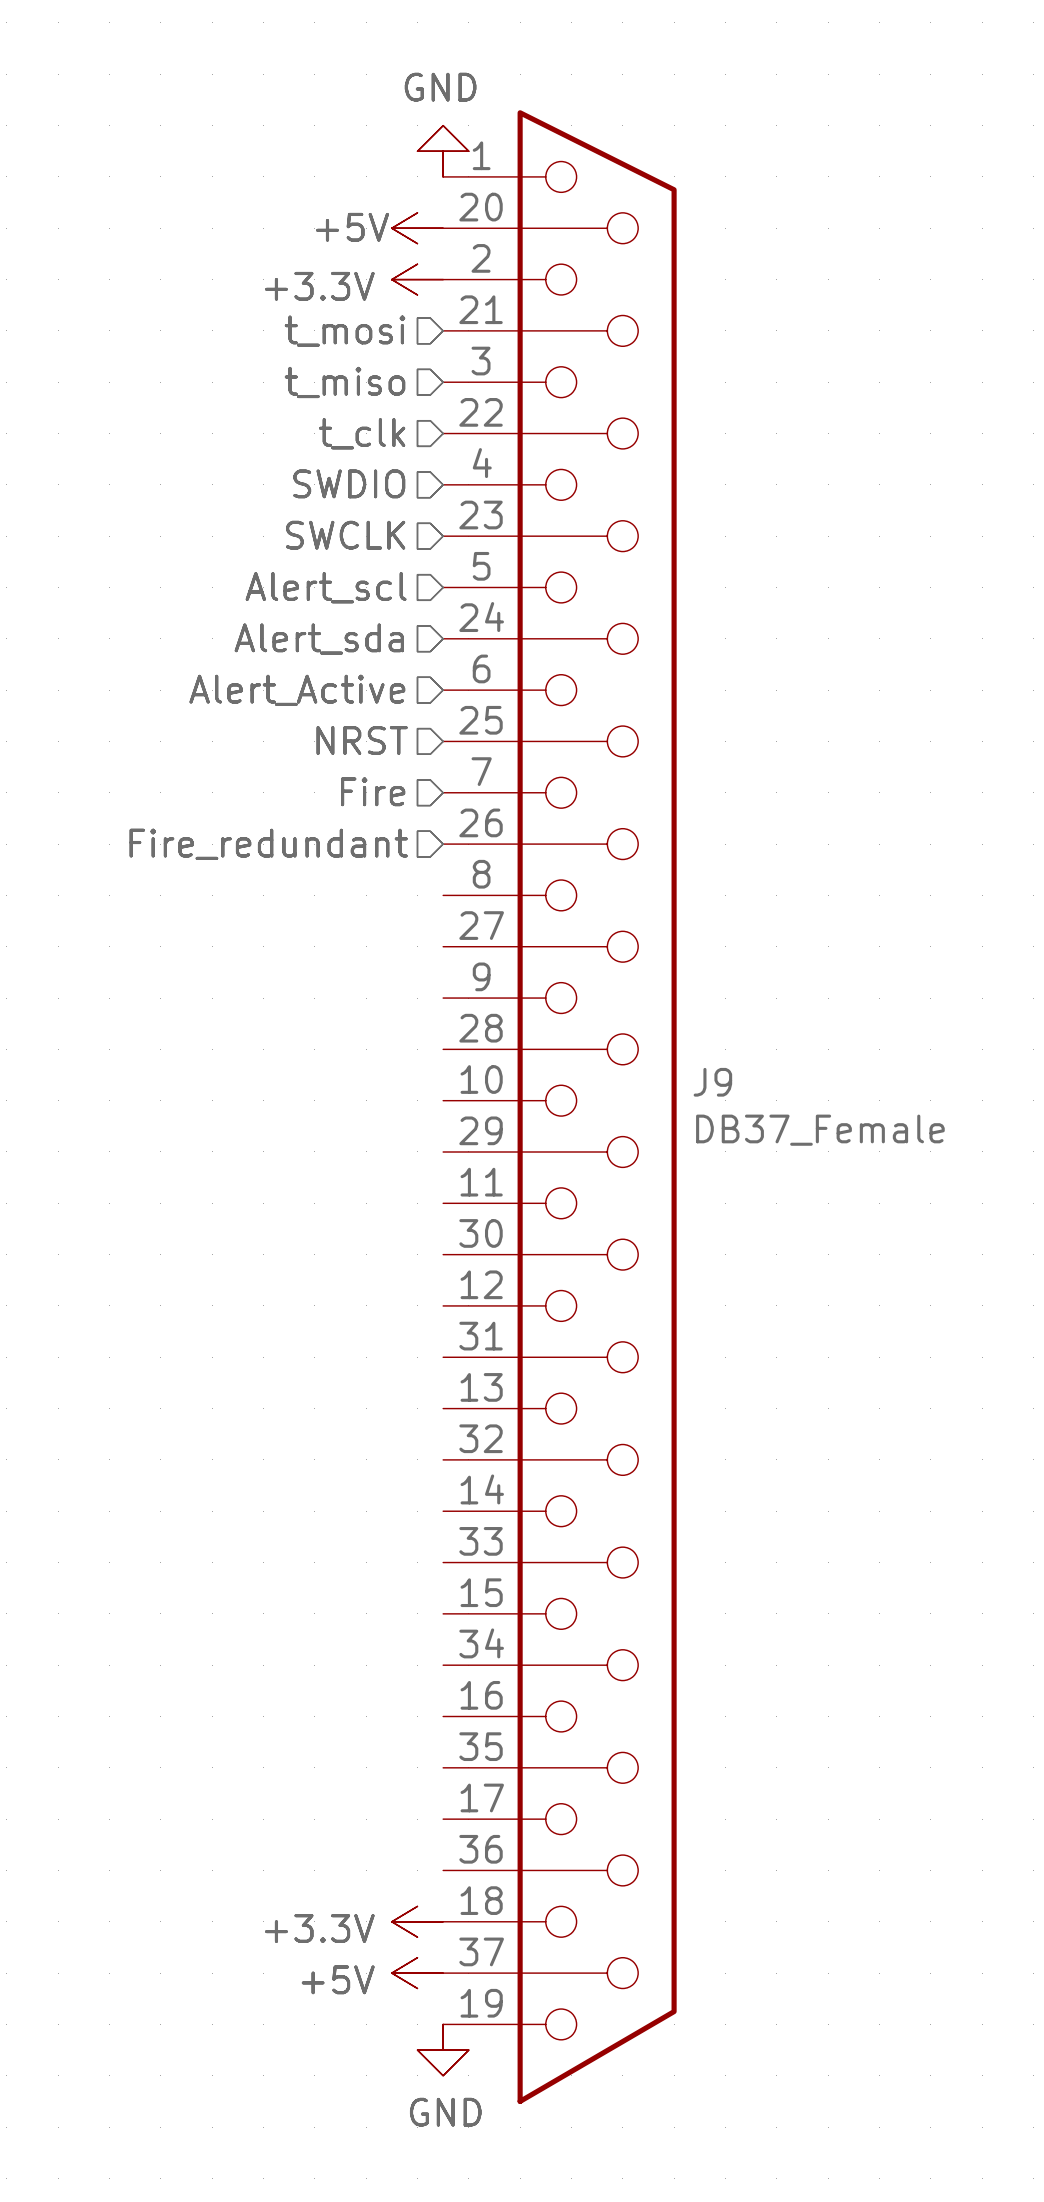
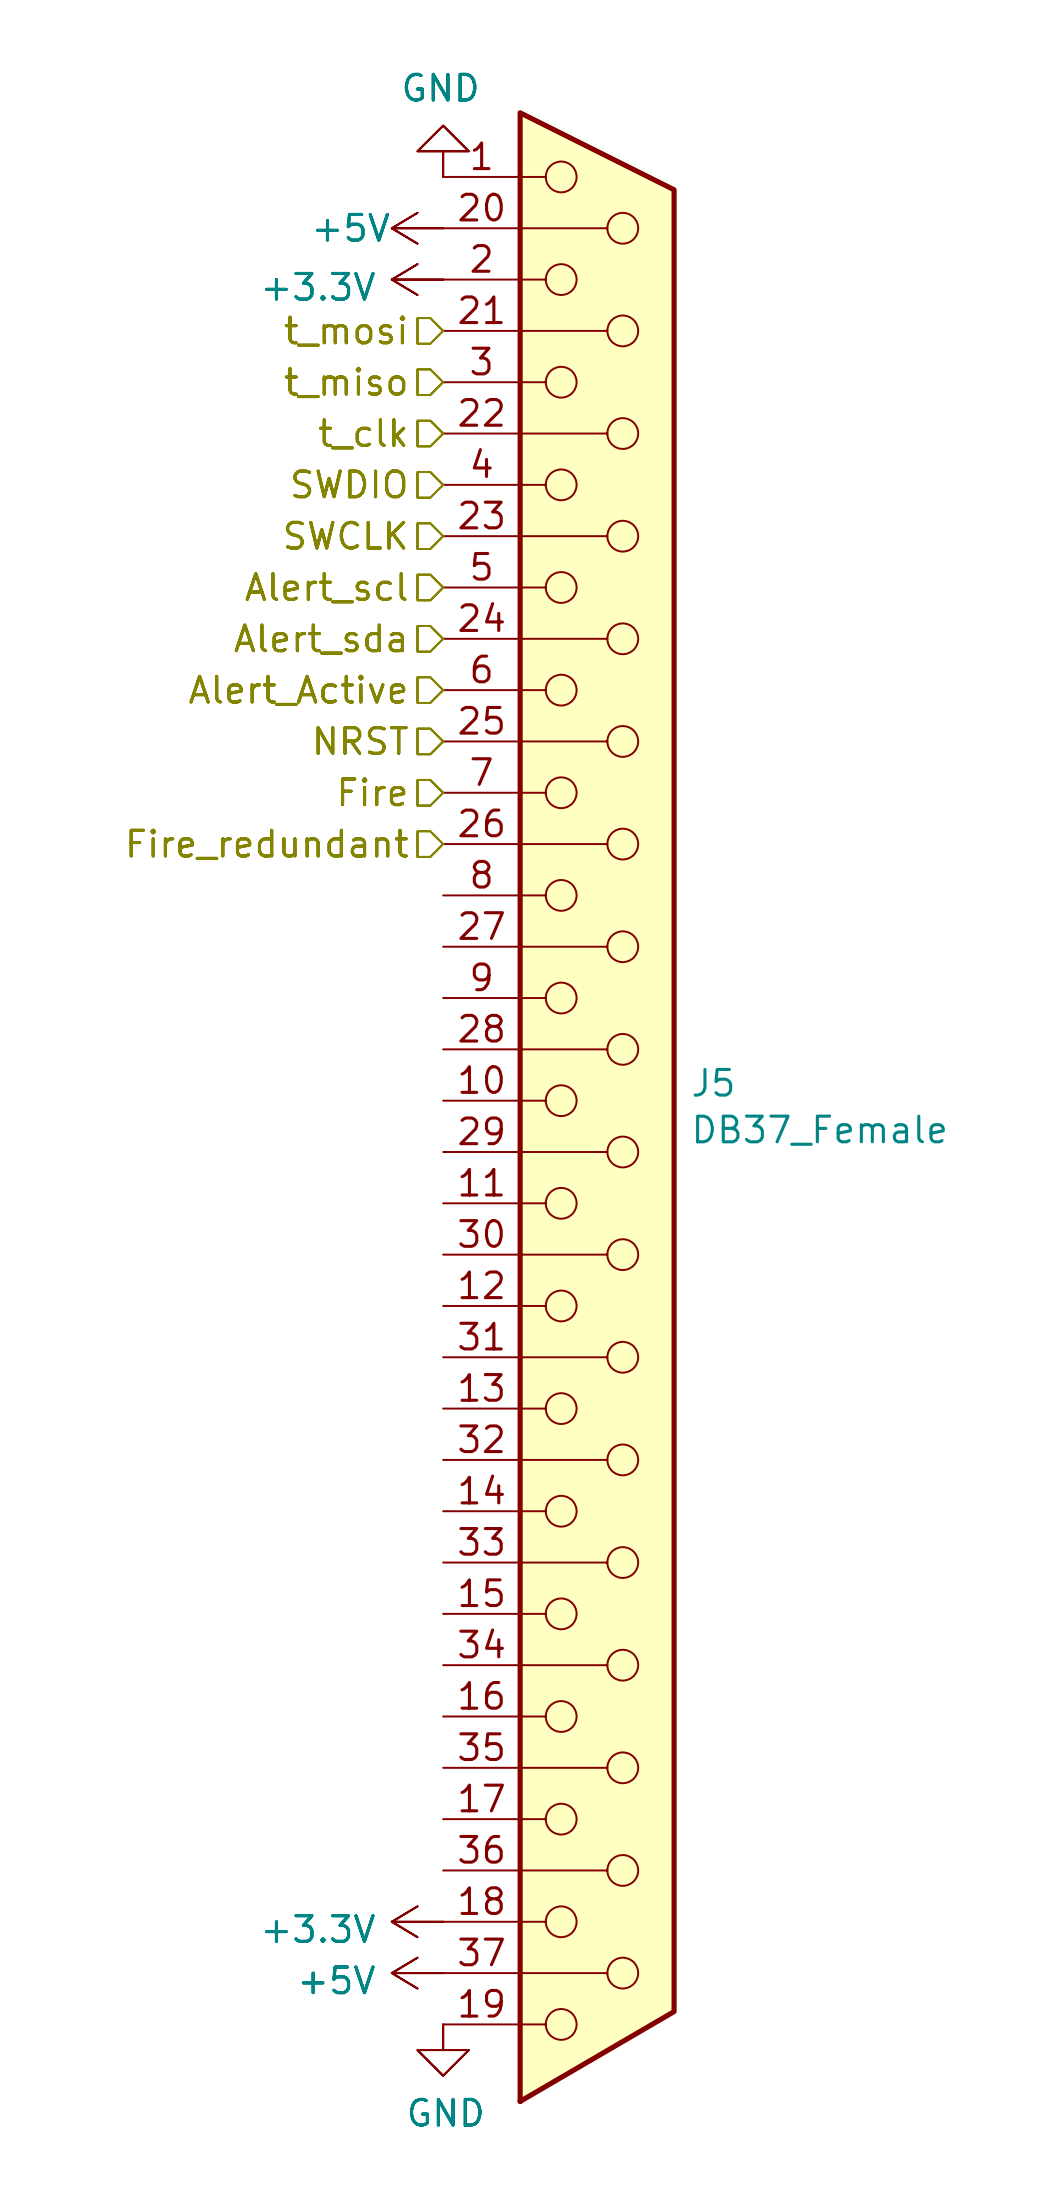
J9 name: J9 (712, 1082) -> J5 (712, 1082)

